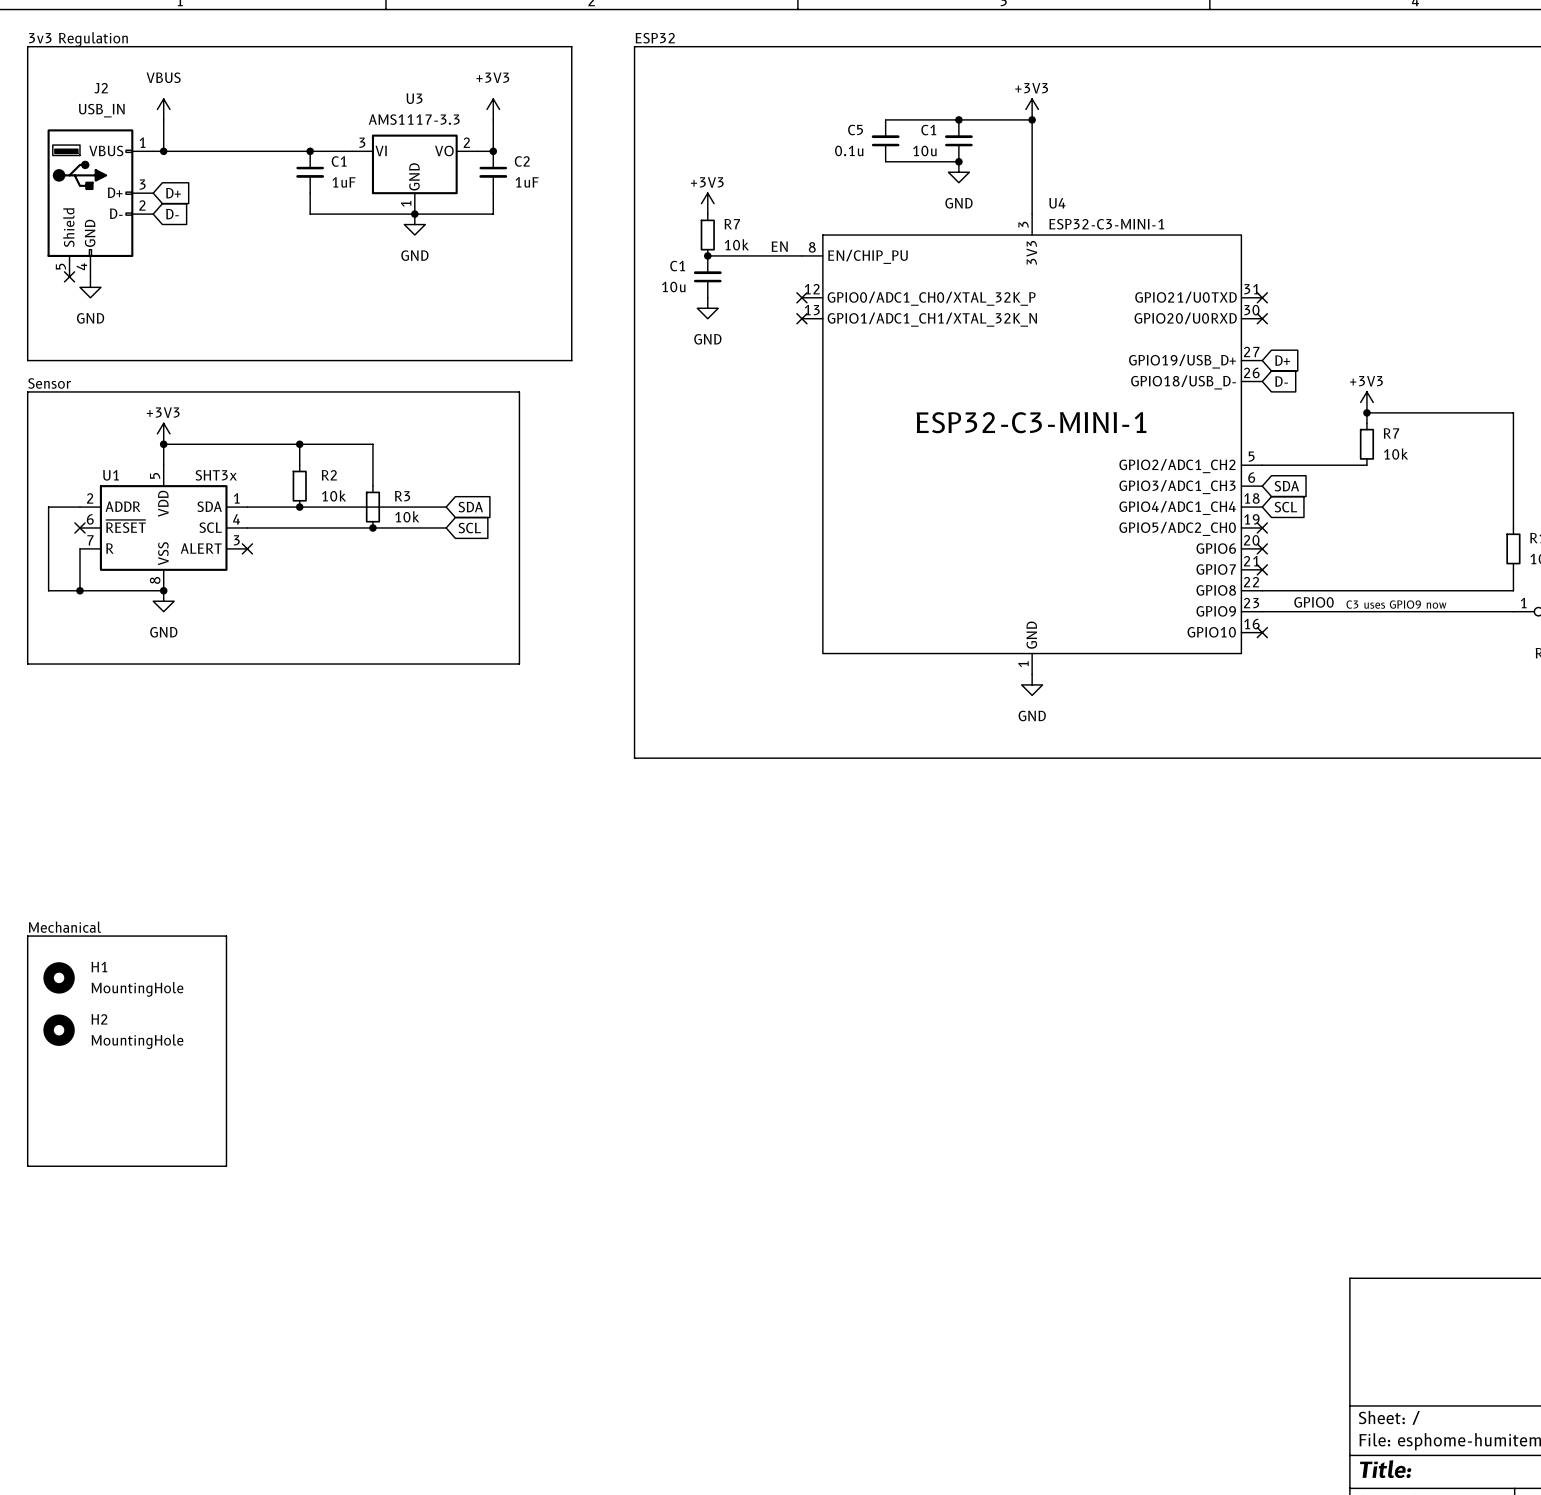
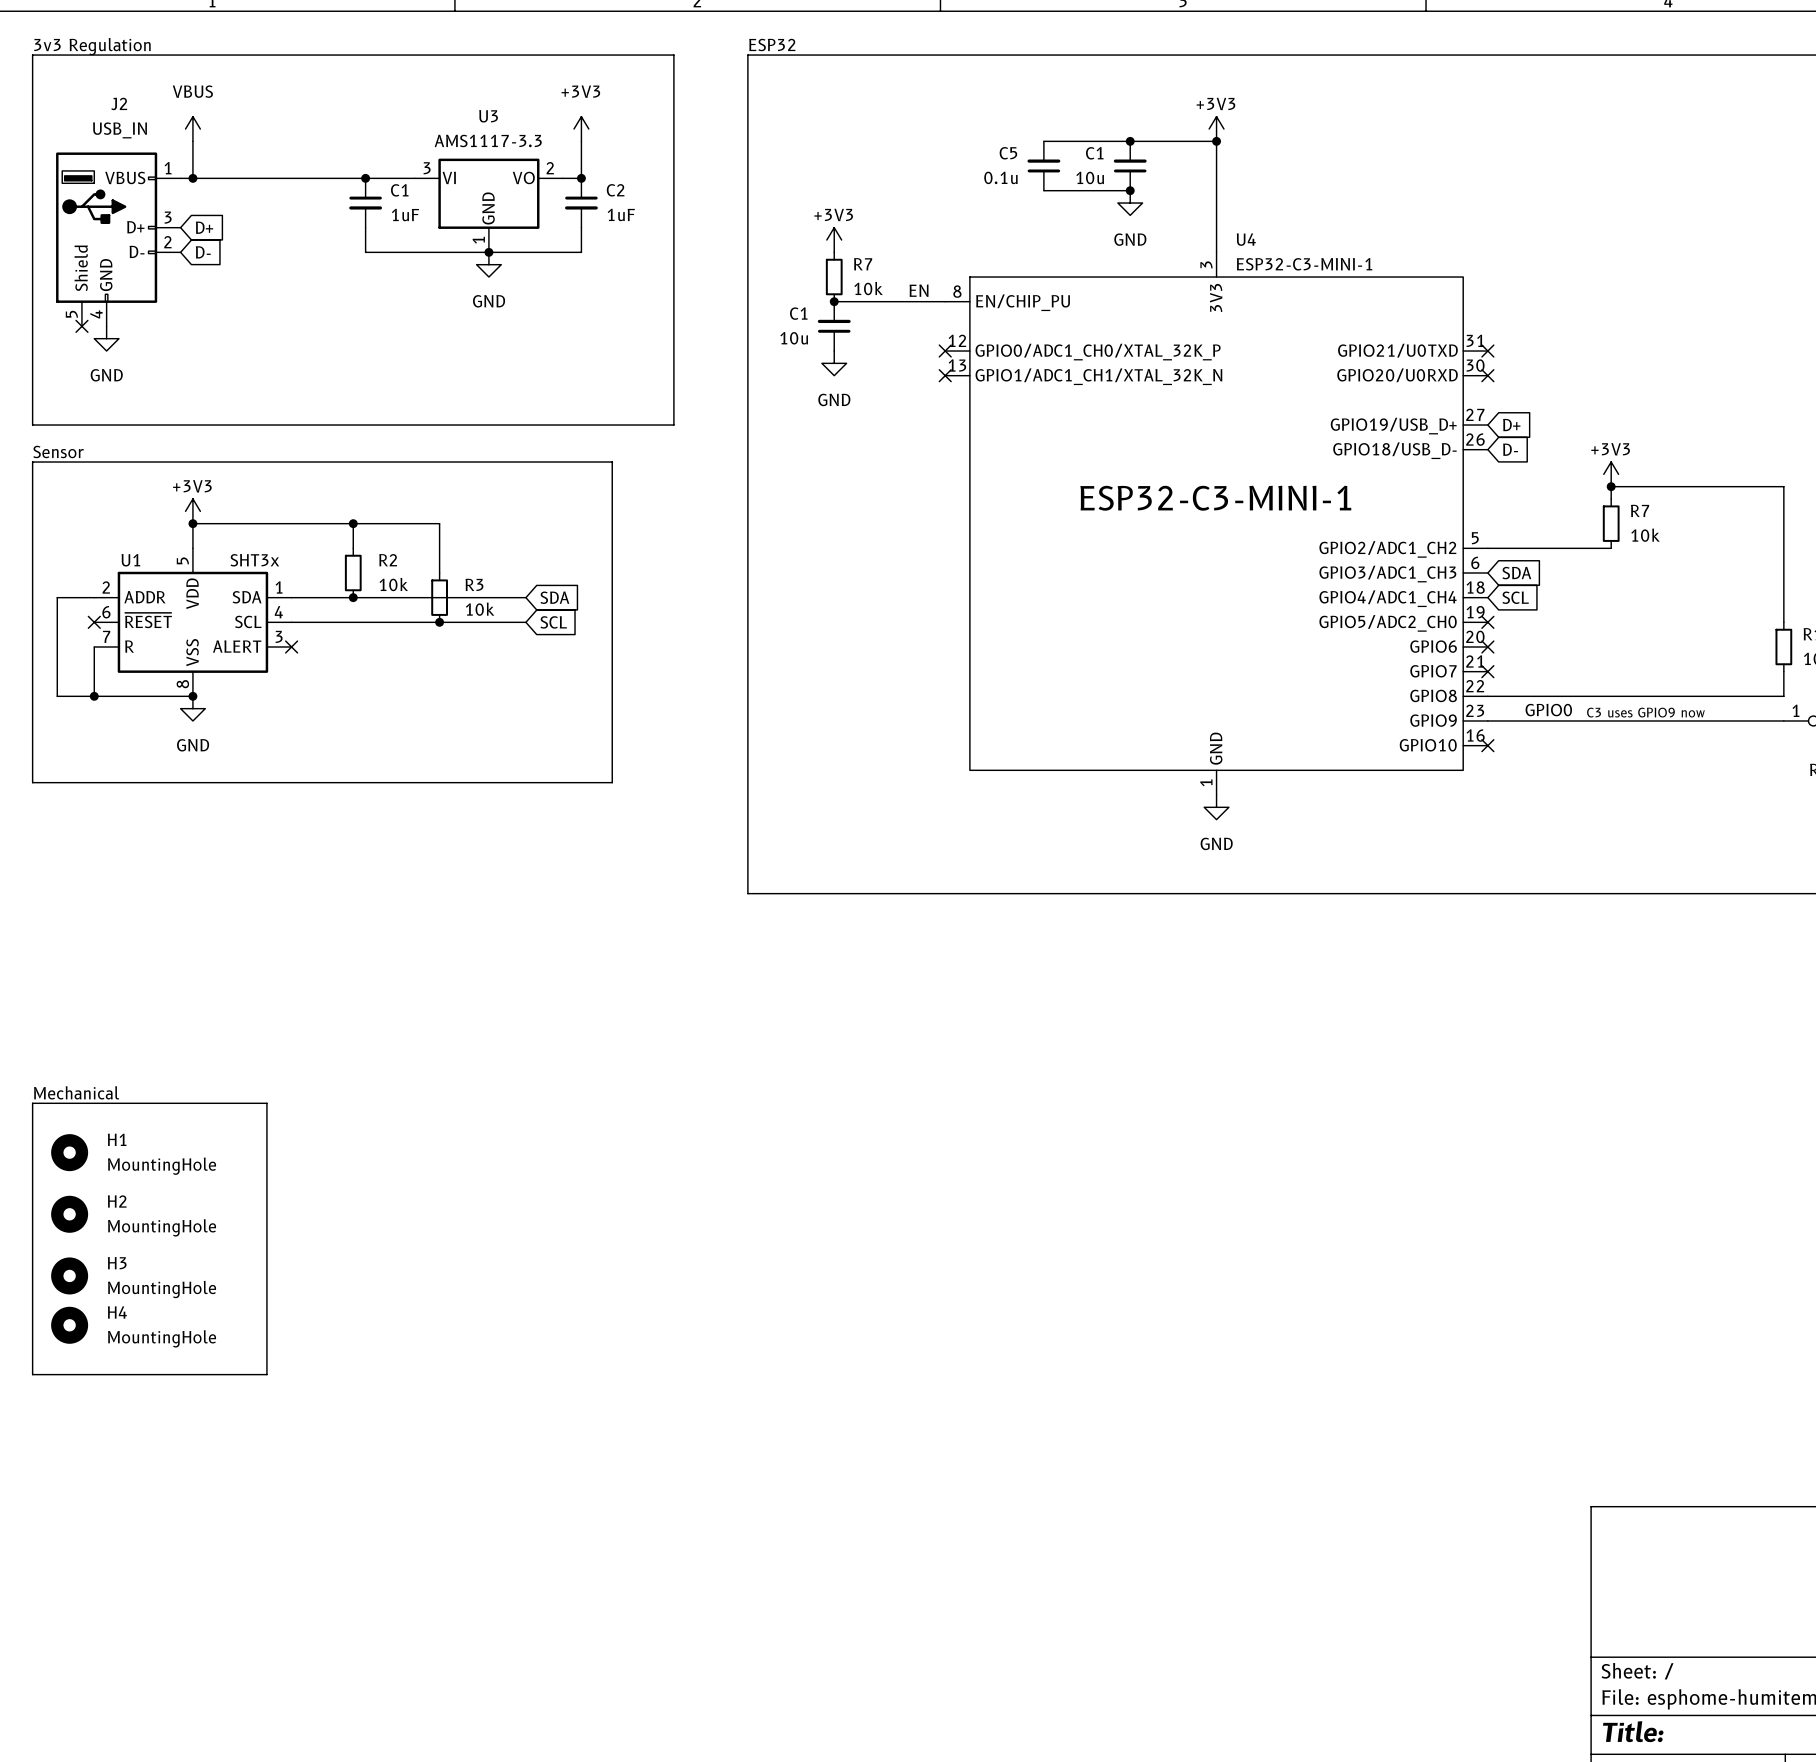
H3: none -> MountingHole (69, 1275)
H4: none -> MountingHole (69, 1325)

